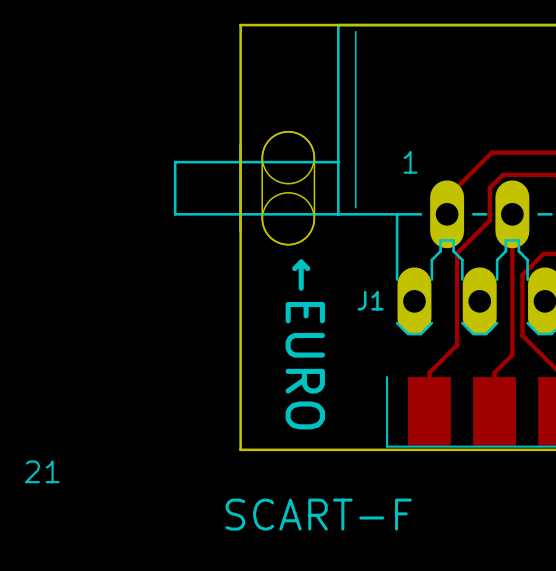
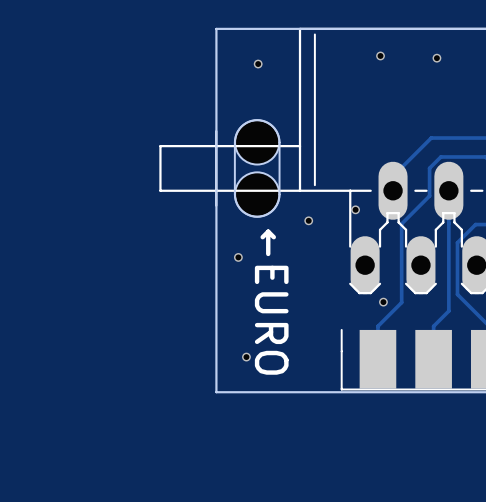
via: none -> (380, 55)
via: none -> (436, 58)
via: none -> (258, 64)
J1 text: 1 (410, 162) -> none
via: none -> (355, 209)
via: none -> (308, 220)
via: none -> (238, 257)
J1 name: J1 (370, 300) -> none
via: none -> (383, 302)
via: none -> (246, 357)
part text: 21 (42, 471) -> none
part text: SCART-F (318, 514) -> none

